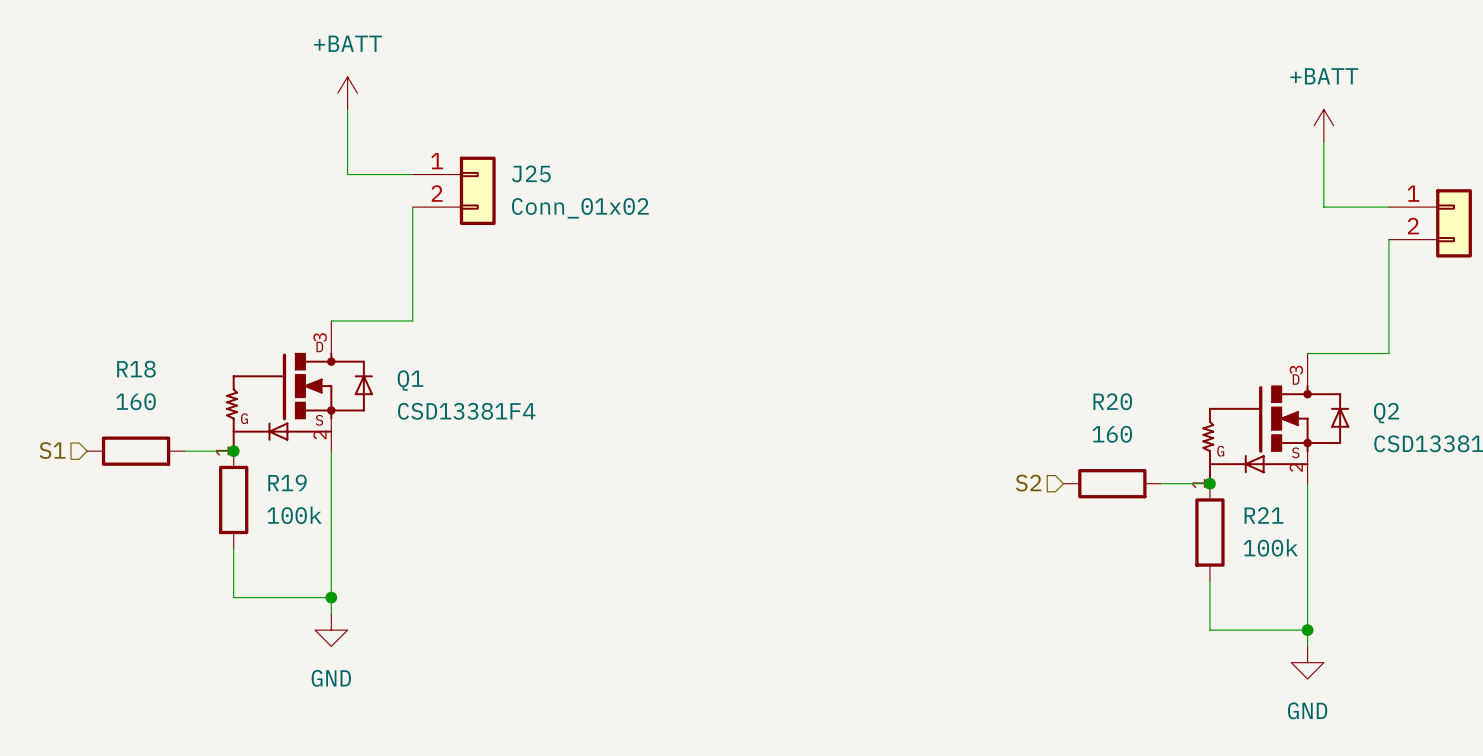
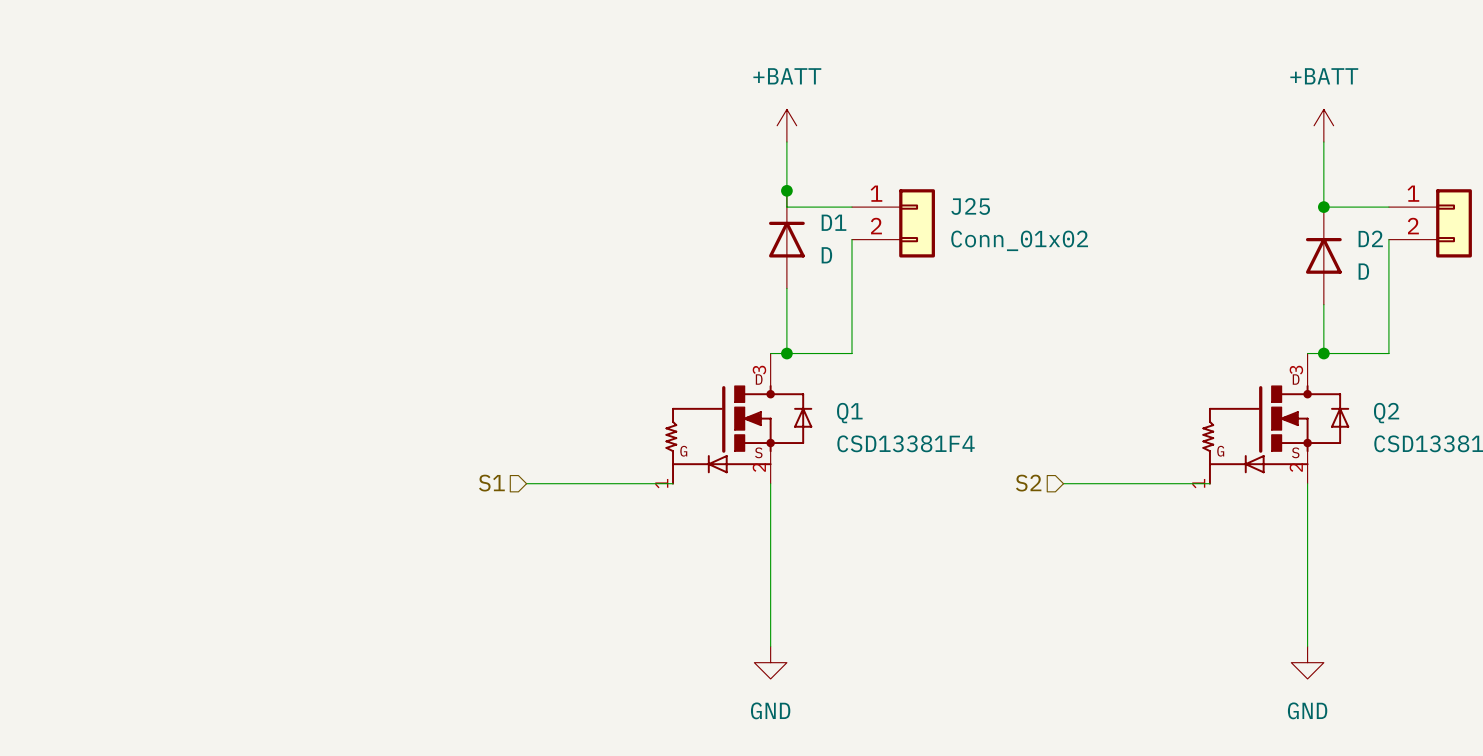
power symbol: +BATT (347, 93) -> none
wire: (347, 109) (347, 174) (412, 174) -> none
power symbol: none -> +BATT (786, 125)
wire: none -> (786, 142) (786, 207) (851, 207)
J25 position: (454, 190) -> (893, 223)
junction: none -> (786, 190)
wire: (412, 207) (412, 320) (331, 320) -> none
junction: none -> (1323, 207)
D1: none -> D (786, 239)
wire: none -> (851, 239) (851, 353) (770, 353)
D2: none -> D (1323, 255)
wire: none -> (786, 288) (786, 353)
wire: none -> (1323, 304) (1323, 353)
junction: none -> (786, 353)
junction: none -> (1323, 353)
Q1 position: (299, 386) -> (738, 419)
hierarchical label: S1 (52, 450) -> none
R18: 160 (136, 451) -> none
wire: (184, 451) (233, 451) -> none
junction: (233, 451) -> none
wire: (331, 451) (331, 613) -> none
hierarchical label: none -> S1 (491, 483)
wire: none -> (526, 483) (673, 483)
wire: none -> (770, 483) (770, 646)
wire: none -> (1063, 483) (1161, 483)
R20: 160 (1112, 483) -> none
junction: (1209, 483) -> none
R19: 100k (233, 499) -> none
R21: 100k (1209, 532) -> none
wire: (233, 548) (233, 597) (331, 597) -> none
wire: (1209, 581) (1209, 630) (1307, 630) -> none
junction: (331, 597) -> none
power symbol: GND (331, 630) -> none
junction: (1307, 630) -> none
power symbol: none -> GND (770, 662)

